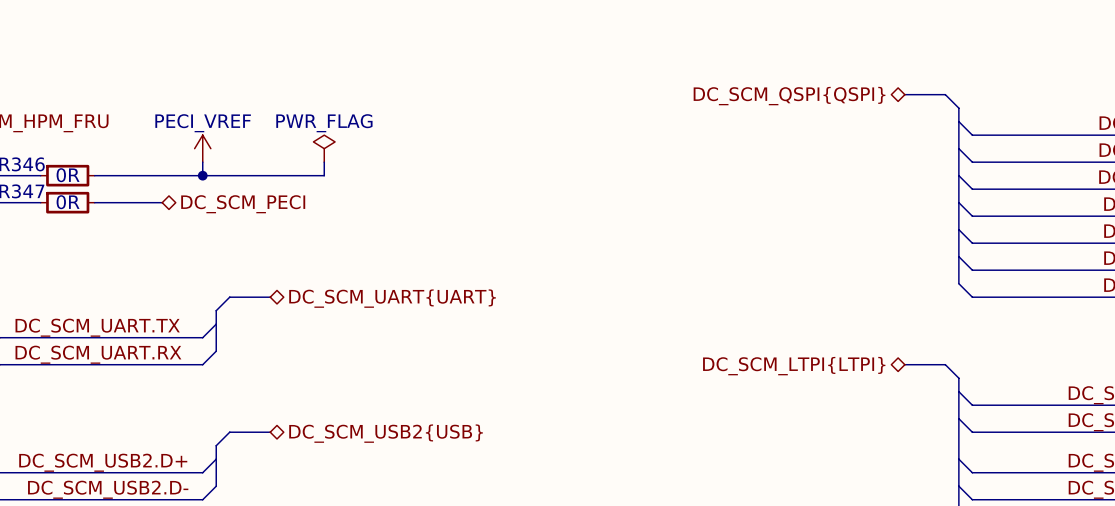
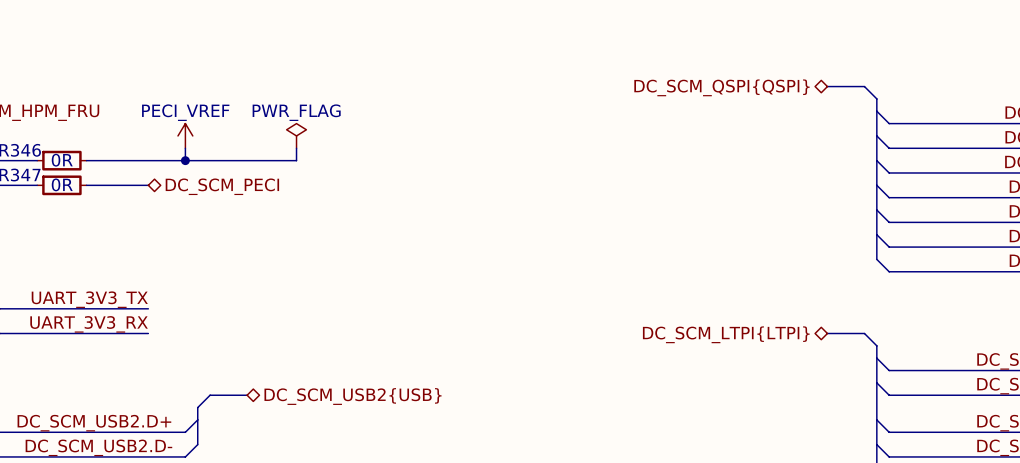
bus: (270, 297) (229, 297) (216, 310) (216, 351) -> none
hierarchical label: DC_SCM_UART{UART} (392, 298) -> none
wire: (216, 324) (202, 337) (162, 337) -> none
label: DC_SCM_UART.TX (97, 327) -> none
label: none -> UART_3V3_TX (89, 299)
wire: (216, 351) (202, 364) (162, 364) -> none
label: none -> UART_3V3_RX (89, 324)
label: DC_SCM_UART.RX (98, 354) -> none

